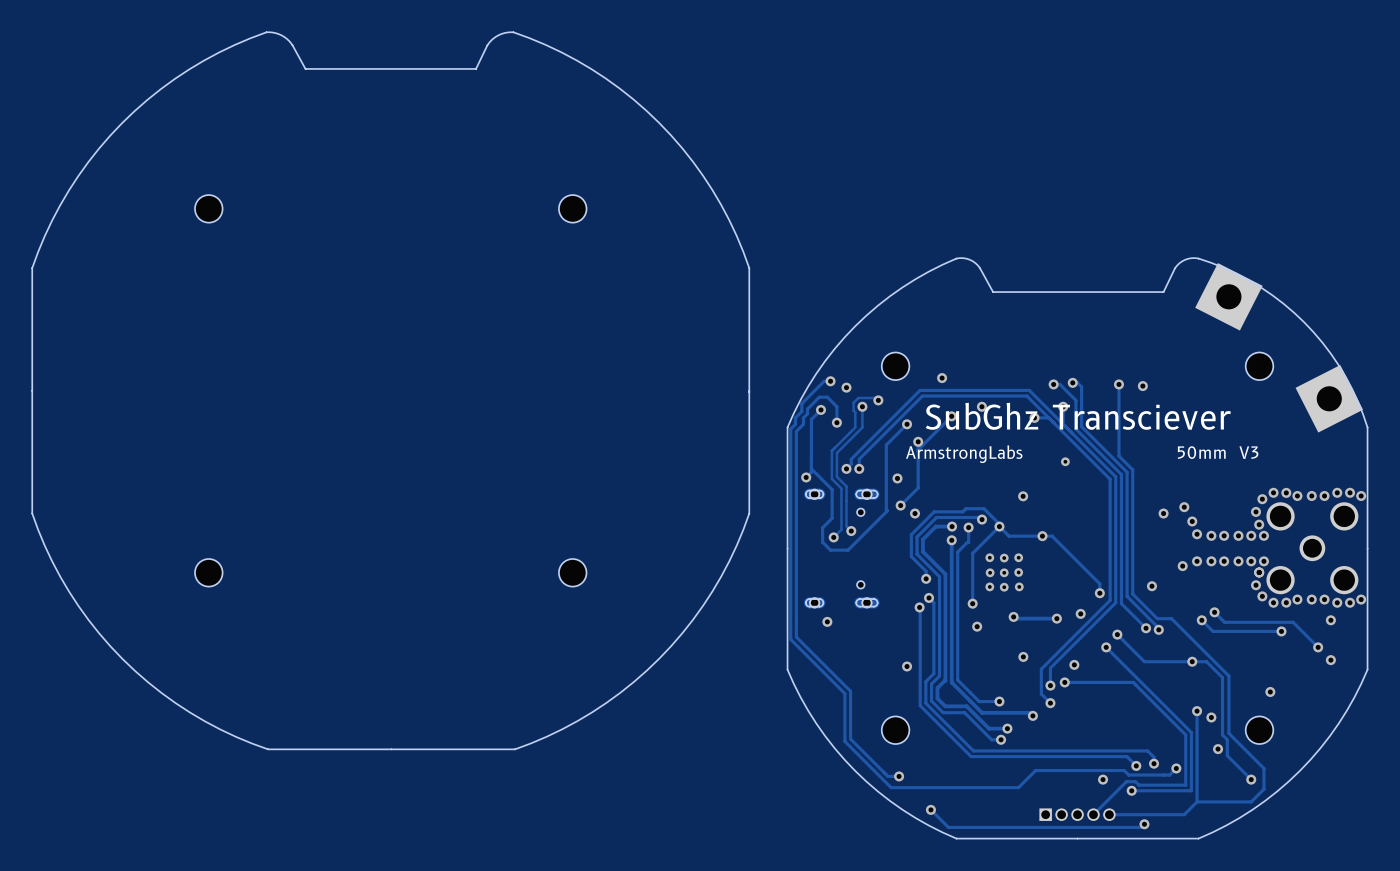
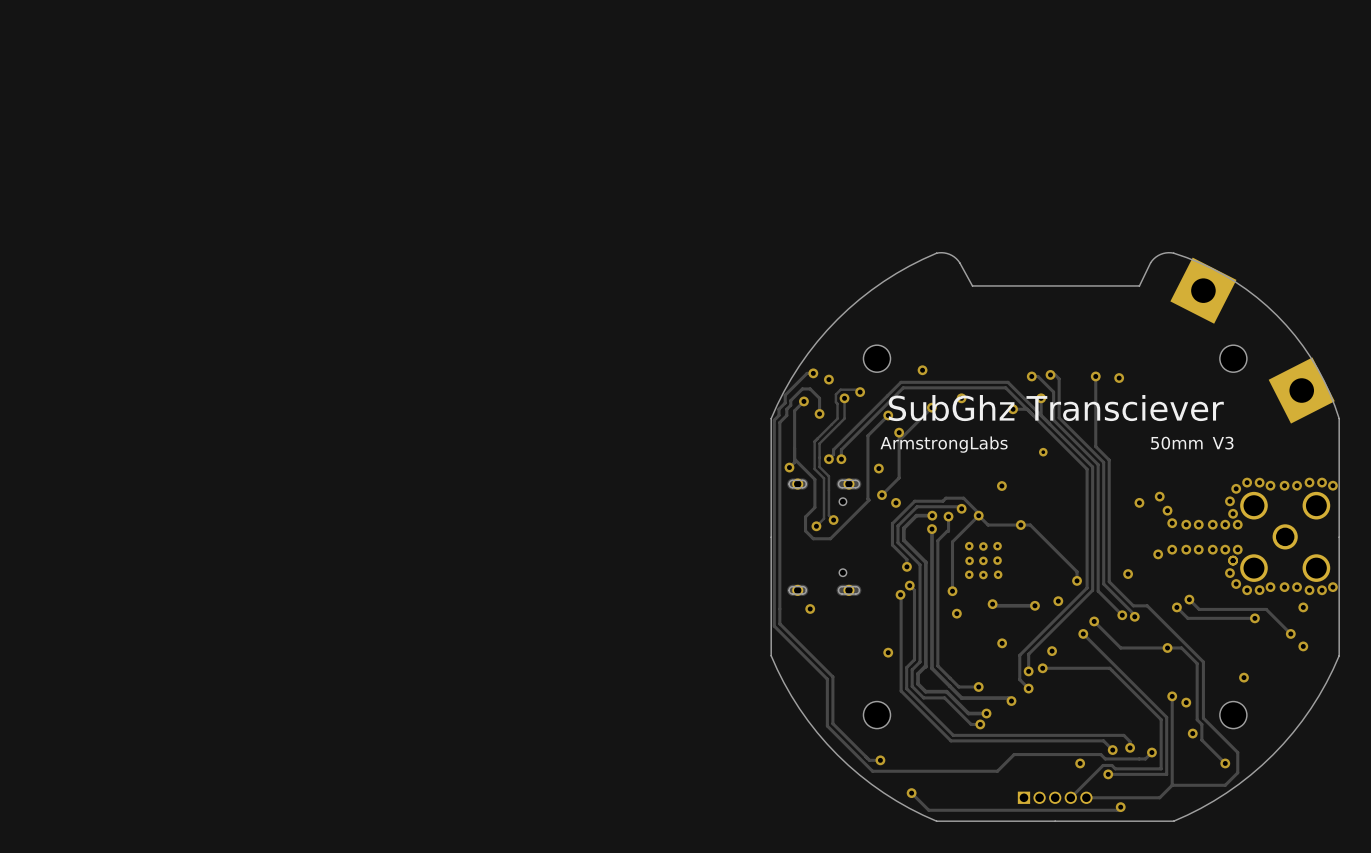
board edge: (513, 32) (545, 44) (576, 60) (605, 78) (633, 99) (658, 122) (692, 161) (712, 190) (729, 220) (749, 268) (749, 513) (729, 561) (712, 591) (693, 619) (671, 646) (647, 670) (620, 692) (592, 712) (562, 729) (515, 749) (268, 749) (235, 736) (204, 721) (175, 703) (148, 682) (122, 659) (99, 633) (69, 591) (52, 561) (32, 513) (32, 268) (44, 236) (60, 205) (78, 176) (99, 148) (134, 111) (160, 89) (189, 69) (219, 52) (250, 38) (269, 32) (281, 35) (288, 40) (305, 68) (476, 68) (491, 40) (501, 34) (513, 32) -> none
part: (208, 208) -> none
part: (572, 208) -> none
part: (208, 572) -> none
part: (572, 572) -> none

